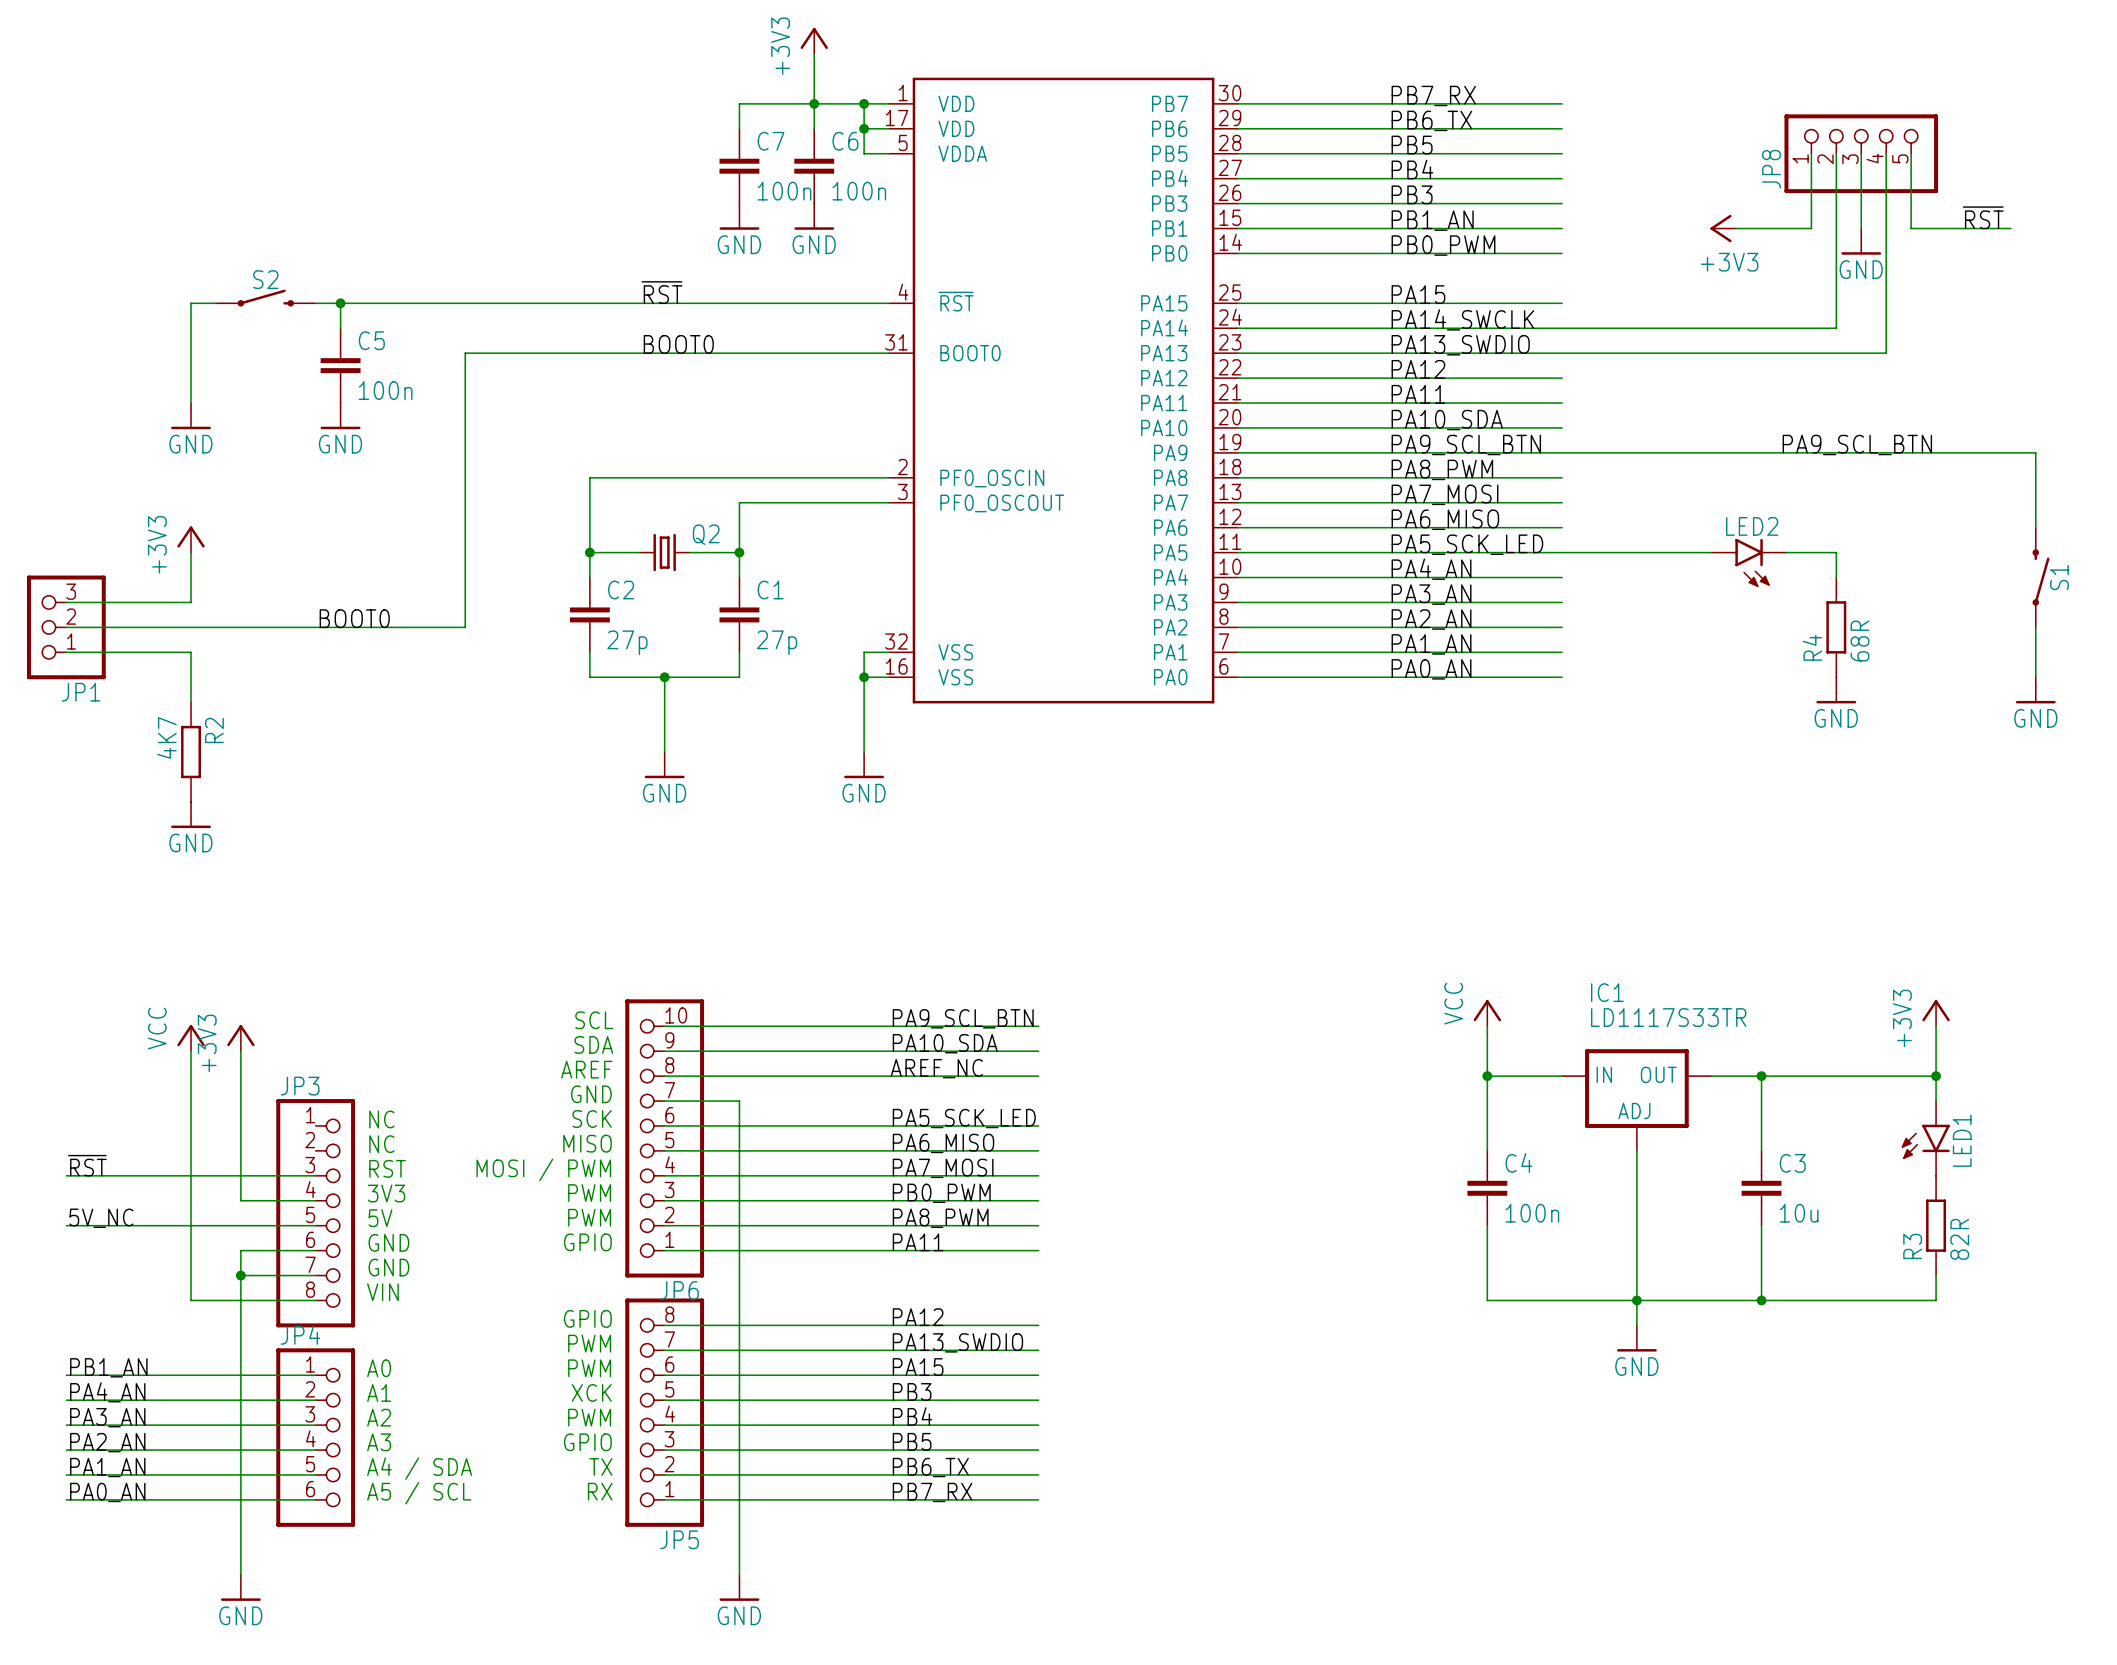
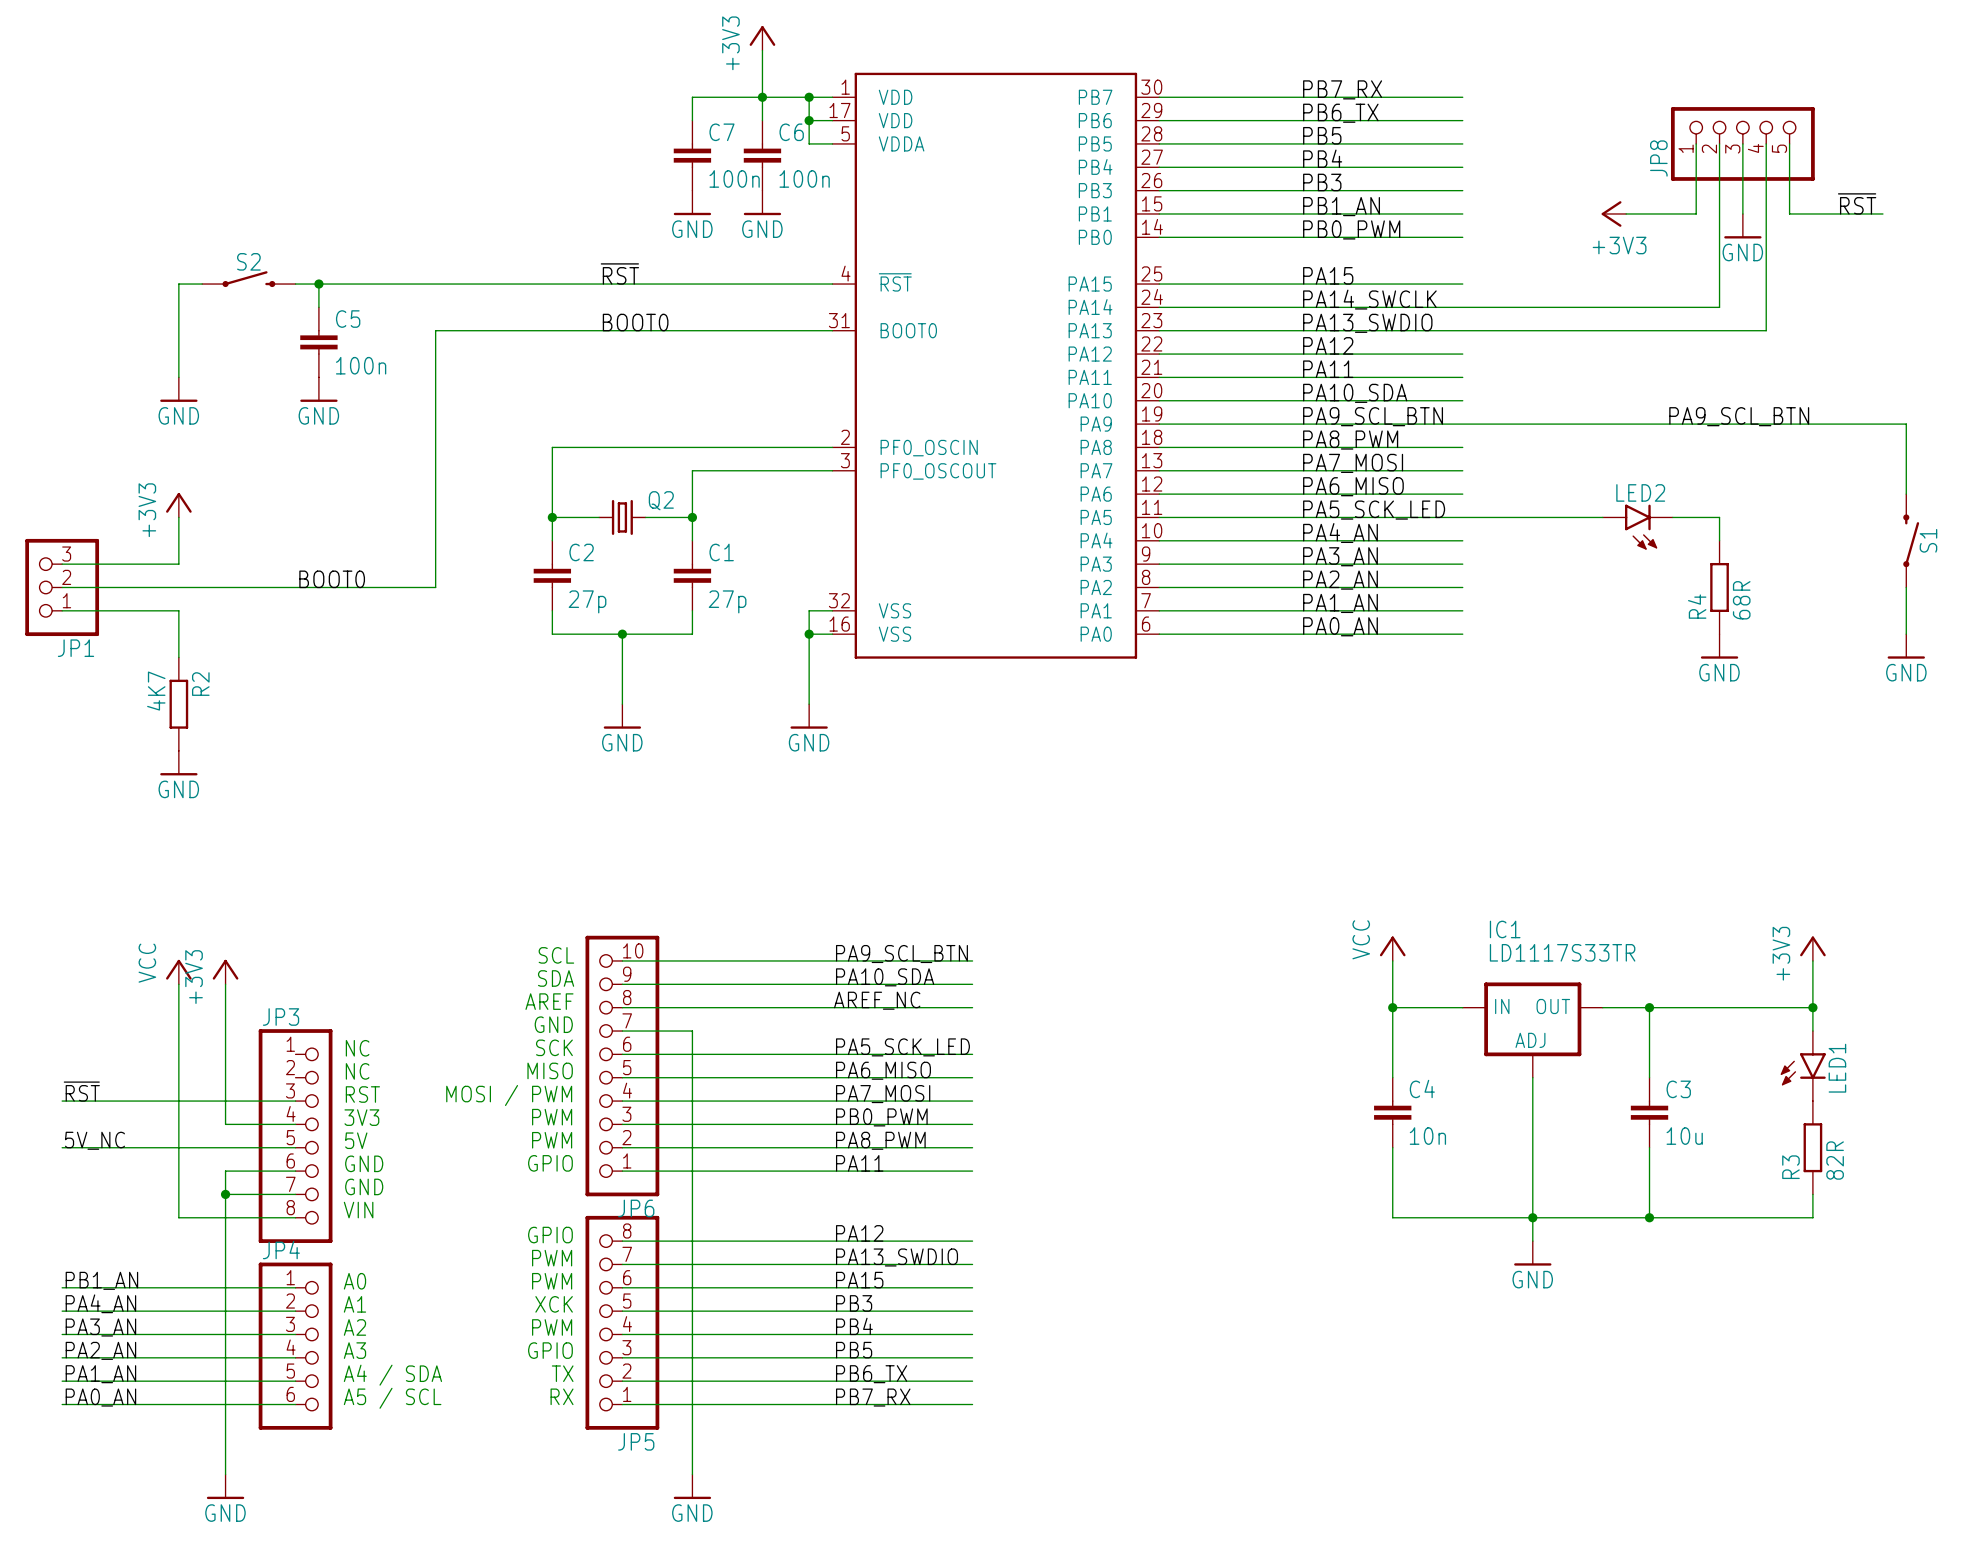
C4 value: 100n (1532, 1213) -> 10n (1427, 1136)

